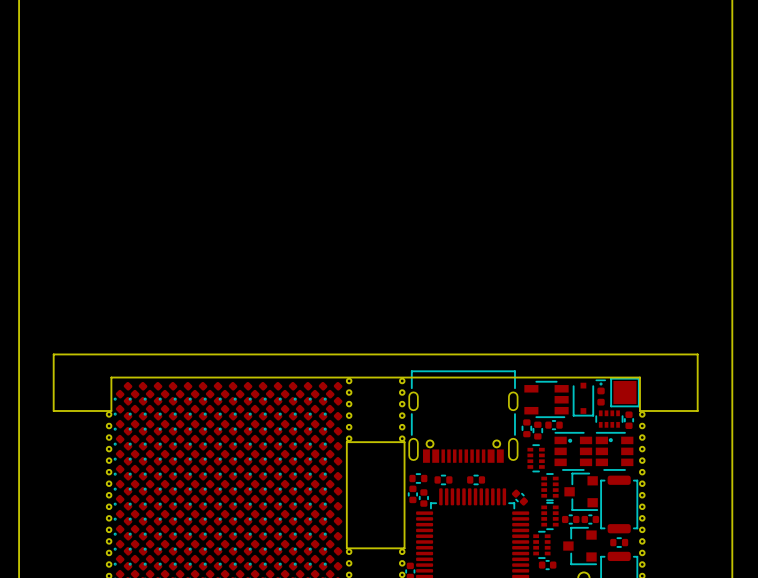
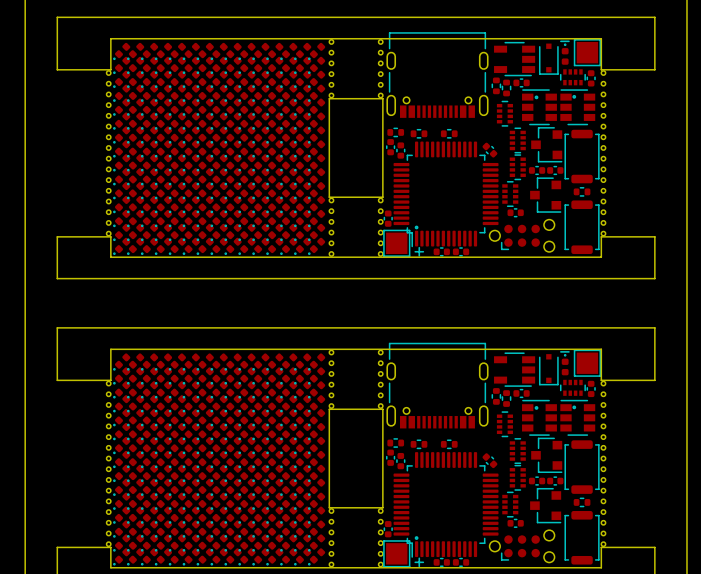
board edge: none -> (57, 17) (57, 69) (110, 69) (110, 38) (601, 38) (601, 69) (654, 69) (654, 17) (57, 17)
text: none -> - (564, 41)
part: none -> (331, 41)
part: none -> (380, 41)
part: none -> (121, 51)
part: none -> (135, 51)
part: none -> (149, 51)
part: none -> (163, 51)
part: none -> (177, 51)
part: none -> (191, 51)
part: none -> (205, 51)
part: none -> (219, 51)
part: none -> (233, 51)
part: none -> (247, 51)
part: none -> (261, 51)
part: none -> (274, 51)
part: none -> (288, 51)
part: none -> (302, 51)
part: none -> (316, 51)
part: none -> (331, 52)
part: none -> (380, 52)
part: none -> (587, 52)
part: none -> (565, 54)
part: none -> (514, 59)
part: none -> (548, 59)
part: none -> (331, 63)
part: none -> (380, 63)
part: none -> (121, 65)
part: none -> (135, 65)
part: none -> (149, 65)
part: none -> (163, 65)
part: none -> (177, 65)
part: none -> (191, 65)
part: none -> (205, 65)
part: none -> (219, 65)
part: none -> (233, 65)
part: none -> (247, 65)
part: none -> (261, 65)
part: none -> (274, 65)
part: none -> (288, 65)
part: none -> (302, 65)
part: none -> (316, 65)
part: none -> (108, 73)
part: none -> (603, 73)
part: none -> (331, 74)
part: none -> (380, 74)
part: none -> (437, 75)
part: none -> (572, 77)
part: none -> (591, 78)
part: none -> (121, 79)
part: none -> (135, 79)
part: none -> (149, 79)
part: none -> (163, 79)
part: none -> (177, 79)
part: none -> (191, 79)
part: none -> (205, 79)
part: none -> (219, 79)
part: none -> (233, 79)
part: none -> (247, 79)
part: none -> (261, 79)
part: none -> (274, 79)
part: none -> (288, 79)
part: none -> (302, 79)
part: none -> (316, 79)
part: none -> (521, 82)
part: none -> (108, 83)
part: none -> (603, 83)
part: none -> (331, 84)
part: none -> (380, 84)
part: none -> (496, 85)
part: none -> (506, 88)
part: none -> (121, 93)
part: none -> (135, 93)
part: none -> (149, 93)
part: none -> (163, 93)
part: none -> (177, 93)
part: none -> (191, 93)
part: none -> (205, 93)
part: none -> (219, 93)
part: none -> (233, 93)
part: none -> (247, 93)
part: none -> (261, 93)
part: none -> (274, 93)
part: none -> (288, 93)
part: none -> (302, 93)
part: none -> (316, 93)
part: none -> (108, 94)
part: none -> (603, 94)
drawing: none -> [572, 94, 577, 99]
part: none -> (331, 95)
part: none -> (380, 95)
drawing: none -> [534, 95, 539, 100]
board edge: none -> (329, 98) (382, 98) (382, 197) (329, 197) (329, 98)
part: none -> (108, 105)
part: none -> (603, 105)
part: none -> (121, 107)
part: none -> (135, 107)
part: none -> (149, 107)
part: none -> (163, 107)
part: none -> (177, 107)
part: none -> (191, 107)
part: none -> (205, 107)
part: none -> (219, 107)
part: none -> (233, 107)
part: none -> (247, 107)
part: none -> (261, 107)
part: none -> (274, 107)
part: none -> (288, 107)
part: none -> (302, 107)
part: none -> (316, 107)
part: none -> (539, 107)
part: none -> (577, 107)
part: none -> (504, 113)
part: none -> (108, 115)
part: none -> (603, 115)
part: none -> (121, 120)
part: none -> (135, 120)
part: none -> (149, 120)
part: none -> (163, 120)
part: none -> (177, 120)
part: none -> (191, 120)
part: none -> (205, 120)
part: none -> (219, 120)
part: none -> (233, 120)
part: none -> (247, 120)
part: none -> (261, 120)
part: none -> (274, 120)
part: none -> (288, 120)
part: none -> (302, 120)
part: none -> (316, 120)
part: none -> (108, 126)
part: none -> (603, 126)
part: none -> (395, 132)
part: none -> (419, 133)
part: none -> (449, 133)
part: none -> (121, 134)
part: none -> (135, 134)
part: none -> (149, 134)
part: none -> (163, 134)
part: none -> (177, 134)
part: none -> (191, 134)
part: none -> (205, 134)
part: none -> (219, 134)
part: none -> (233, 134)
part: none -> (247, 134)
part: none -> (261, 134)
part: none -> (274, 134)
part: none -> (288, 134)
part: none -> (302, 134)
part: none -> (316, 134)
part: none -> (108, 137)
part: none -> (603, 137)
part: none -> (517, 140)
part: none -> (546, 144)
part: none -> (390, 147)
part: none -> (108, 147)
part: none -> (603, 147)
part: none -> (121, 148)
part: none -> (135, 148)
part: none -> (149, 148)
part: none -> (163, 148)
part: none -> (177, 148)
part: none -> (191, 148)
part: none -> (205, 148)
part: none -> (219, 148)
part: none -> (233, 148)
part: none -> (247, 148)
part: none -> (261, 148)
part: none -> (274, 148)
part: none -> (288, 148)
part: none -> (302, 148)
part: none -> (316, 148)
part: none -> (489, 150)
part: none -> (400, 150)
part: none -> (582, 156)
part: none -> (108, 158)
part: none -> (603, 158)
part: none -> (121, 162)
part: none -> (135, 162)
part: none -> (149, 162)
part: none -> (163, 162)
part: none -> (177, 162)
part: none -> (191, 162)
part: none -> (205, 162)
part: none -> (219, 162)
part: none -> (233, 162)
part: none -> (247, 162)
part: none -> (261, 162)
part: none -> (274, 162)
part: none -> (288, 162)
part: none -> (302, 162)
part: none -> (316, 162)
part: none -> (517, 167)
part: none -> (108, 169)
part: none -> (603, 169)
part: none -> (537, 170)
part: none -> (555, 170)
part: none -> (121, 176)
part: none -> (135, 176)
part: none -> (149, 176)
part: none -> (163, 176)
part: none -> (177, 176)
part: none -> (191, 176)
part: none -> (205, 176)
part: none -> (219, 176)
part: none -> (233, 176)
part: none -> (247, 176)
part: none -> (261, 176)
part: none -> (274, 176)
part: none -> (288, 176)
part: none -> (302, 176)
part: none -> (316, 176)
part: none -> (108, 180)
part: none -> (603, 180)
part: none -> (108, 190)
part: none -> (121, 190)
part: none -> (135, 190)
part: none -> (149, 190)
part: none -> (163, 190)
part: none -> (177, 190)
part: none -> (191, 190)
part: none -> (205, 190)
part: none -> (219, 190)
part: none -> (233, 190)
part: none -> (247, 190)
part: none -> (261, 190)
part: none -> (274, 190)
part: none -> (288, 190)
part: none -> (302, 190)
part: none -> (316, 190)
part: none -> (603, 190)
part: none -> (582, 191)
part: none -> (446, 194)
part: none -> (510, 194)
part: none -> (545, 195)
part: none -> (331, 200)
part: none -> (380, 200)
part: none -> (108, 201)
part: none -> (603, 201)
part: none -> (121, 204)
part: none -> (135, 204)
part: none -> (149, 204)
part: none -> (163, 204)
part: none -> (177, 204)
part: none -> (191, 204)
part: none -> (205, 204)
part: none -> (219, 204)
part: none -> (233, 204)
part: none -> (247, 204)
part: none -> (261, 204)
part: none -> (274, 204)
part: none -> (288, 204)
part: none -> (302, 204)
part: none -> (316, 204)
part: none -> (331, 211)
part: none -> (380, 211)
part: none -> (108, 212)
part: none -> (603, 212)
part: none -> (515, 212)
part: none -> (121, 218)
part: none -> (135, 218)
part: none -> (149, 218)
part: none -> (163, 218)
part: none -> (177, 218)
part: none -> (191, 218)
part: none -> (205, 218)
part: none -> (219, 218)
part: none -> (233, 218)
part: none -> (247, 218)
part: none -> (261, 218)
part: none -> (274, 218)
part: none -> (288, 218)
part: none -> (302, 218)
part: none -> (316, 218)
part: none -> (388, 218)
part: none -> (331, 221)
part: none -> (380, 221)
part: none -> (108, 222)
part: none -> (603, 222)
drawing: none -> [414, 225, 419, 230]
part: none -> (582, 227)
part: none -> (121, 232)
part: none -> (135, 232)
part: none -> (149, 232)
part: none -> (163, 232)
part: none -> (177, 232)
part: none -> (191, 232)
part: none -> (205, 232)
part: none -> (219, 232)
part: none -> (233, 232)
part: none -> (247, 232)
part: none -> (261, 232)
part: none -> (274, 232)
part: none -> (288, 232)
part: none -> (302, 232)
part: none -> (316, 232)
part: none -> (331, 232)
part: none -> (380, 232)
part: none -> (108, 233)
part: none -> (603, 233)
part: none -> (522, 235)
board edge: none -> (57, 236) (110, 236) (110, 257) (601, 257) (601, 236) (654, 236) (654, 278) (57, 278) (57, 236)
part: none -> (331, 243)
part: none -> (380, 243)
part: none -> (396, 243)
part: none -> (121, 246)
part: none -> (135, 246)
part: none -> (149, 246)
part: none -> (163, 246)
part: none -> (177, 246)
part: none -> (191, 246)
part: none -> (205, 246)
part: none -> (219, 246)
part: none -> (233, 246)
part: none -> (247, 246)
part: none -> (261, 246)
part: none -> (274, 246)
part: none -> (288, 246)
part: none -> (302, 246)
part: none -> (316, 246)
text: none -> + (419, 251)
part: none -> (441, 251)
part: none -> (461, 251)
part: none -> (331, 253)
part: none -> (380, 253)

